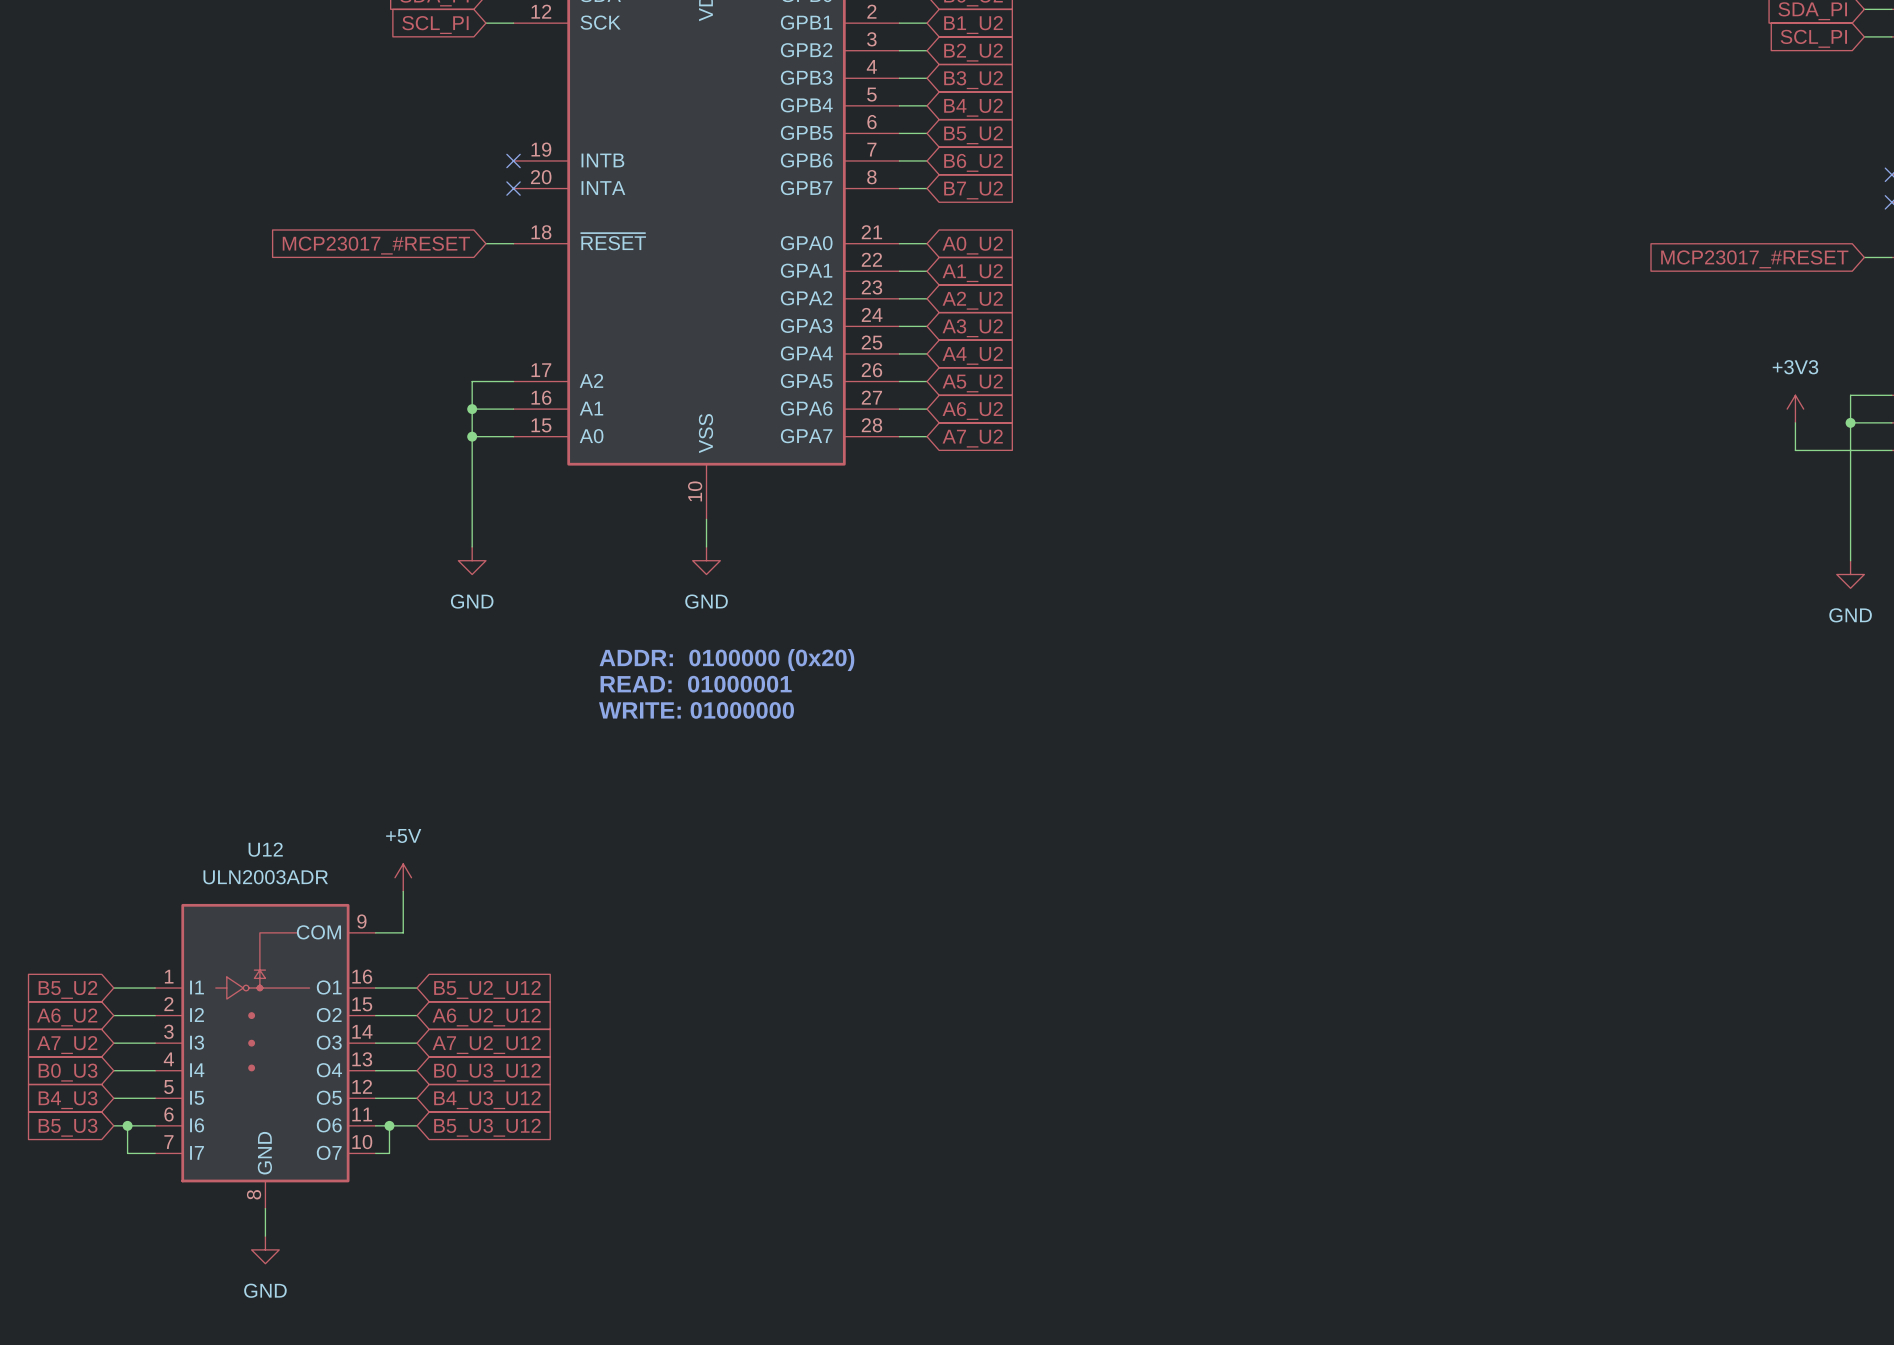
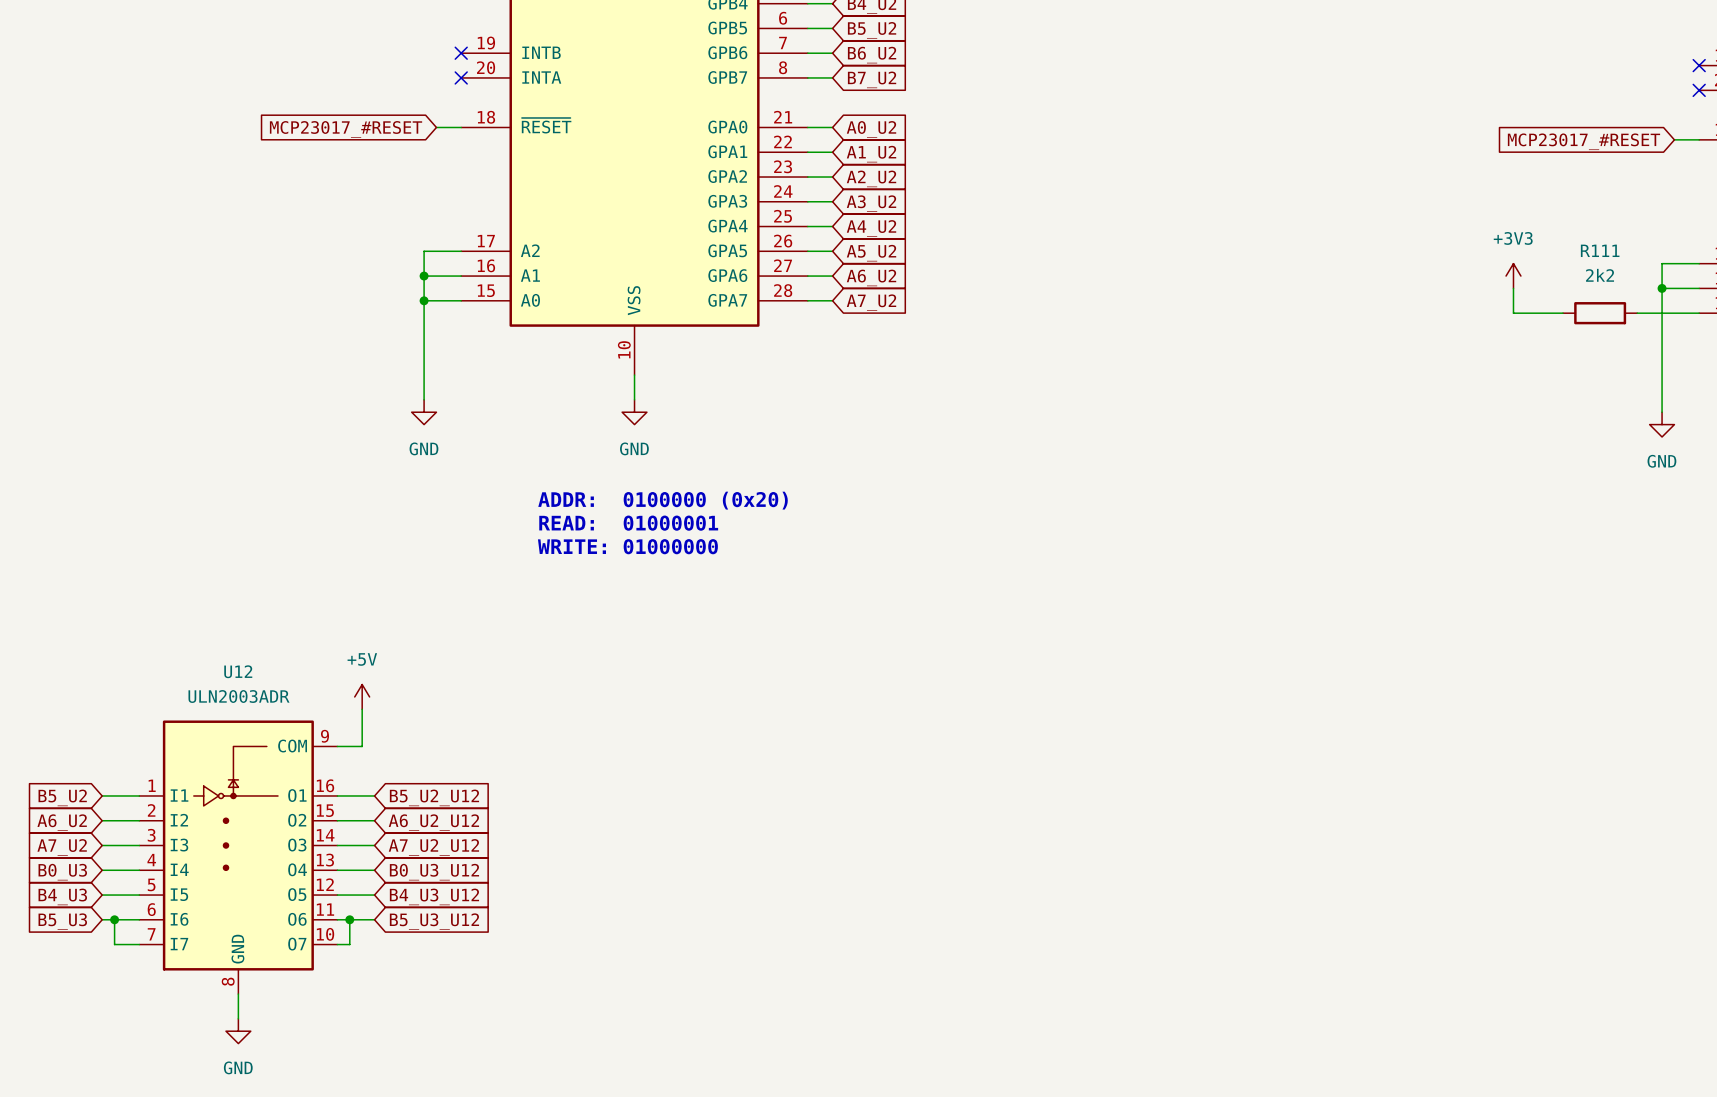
power symbol position: +3V3 (1795, 409) -> +3V3 (1513, 276)
wire: none -> (1513, 288) (1513, 313) (1563, 313)
wire: (1795, 422) (1795, 450) (1823, 450) -> none
R111: none -> 2k2 (1600, 313)

